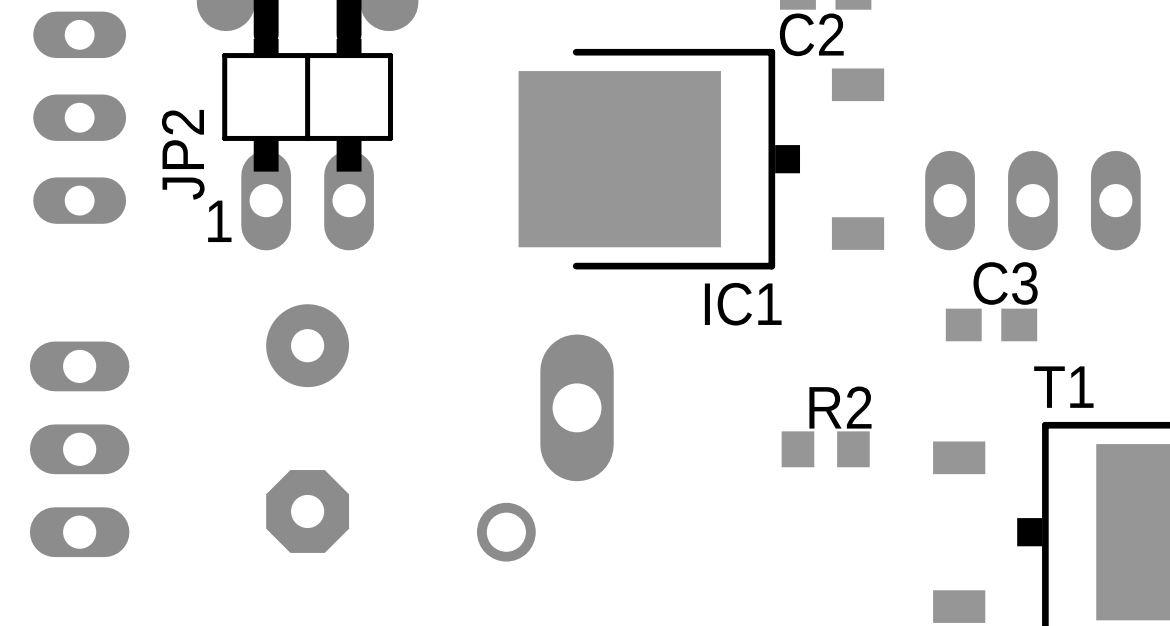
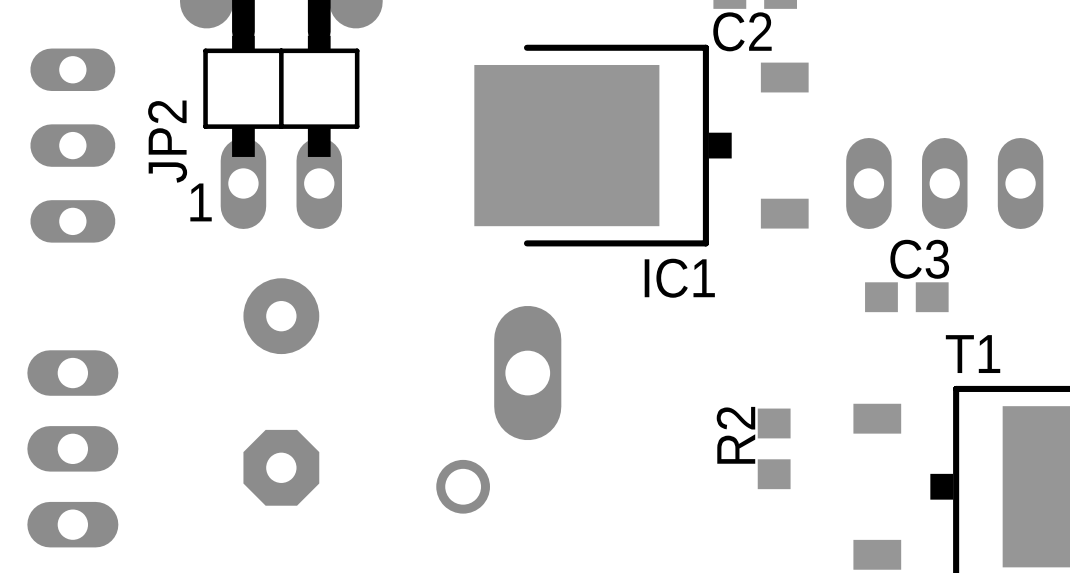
part position: (79, 117) -> (72, 145)
R2 name position: R2 (840, 407) -> R2 (735, 435)
part position: (79, 449) -> (72, 448)
R2 rotation: 0° (825, 449) -> 90° clockwise (774, 448)

